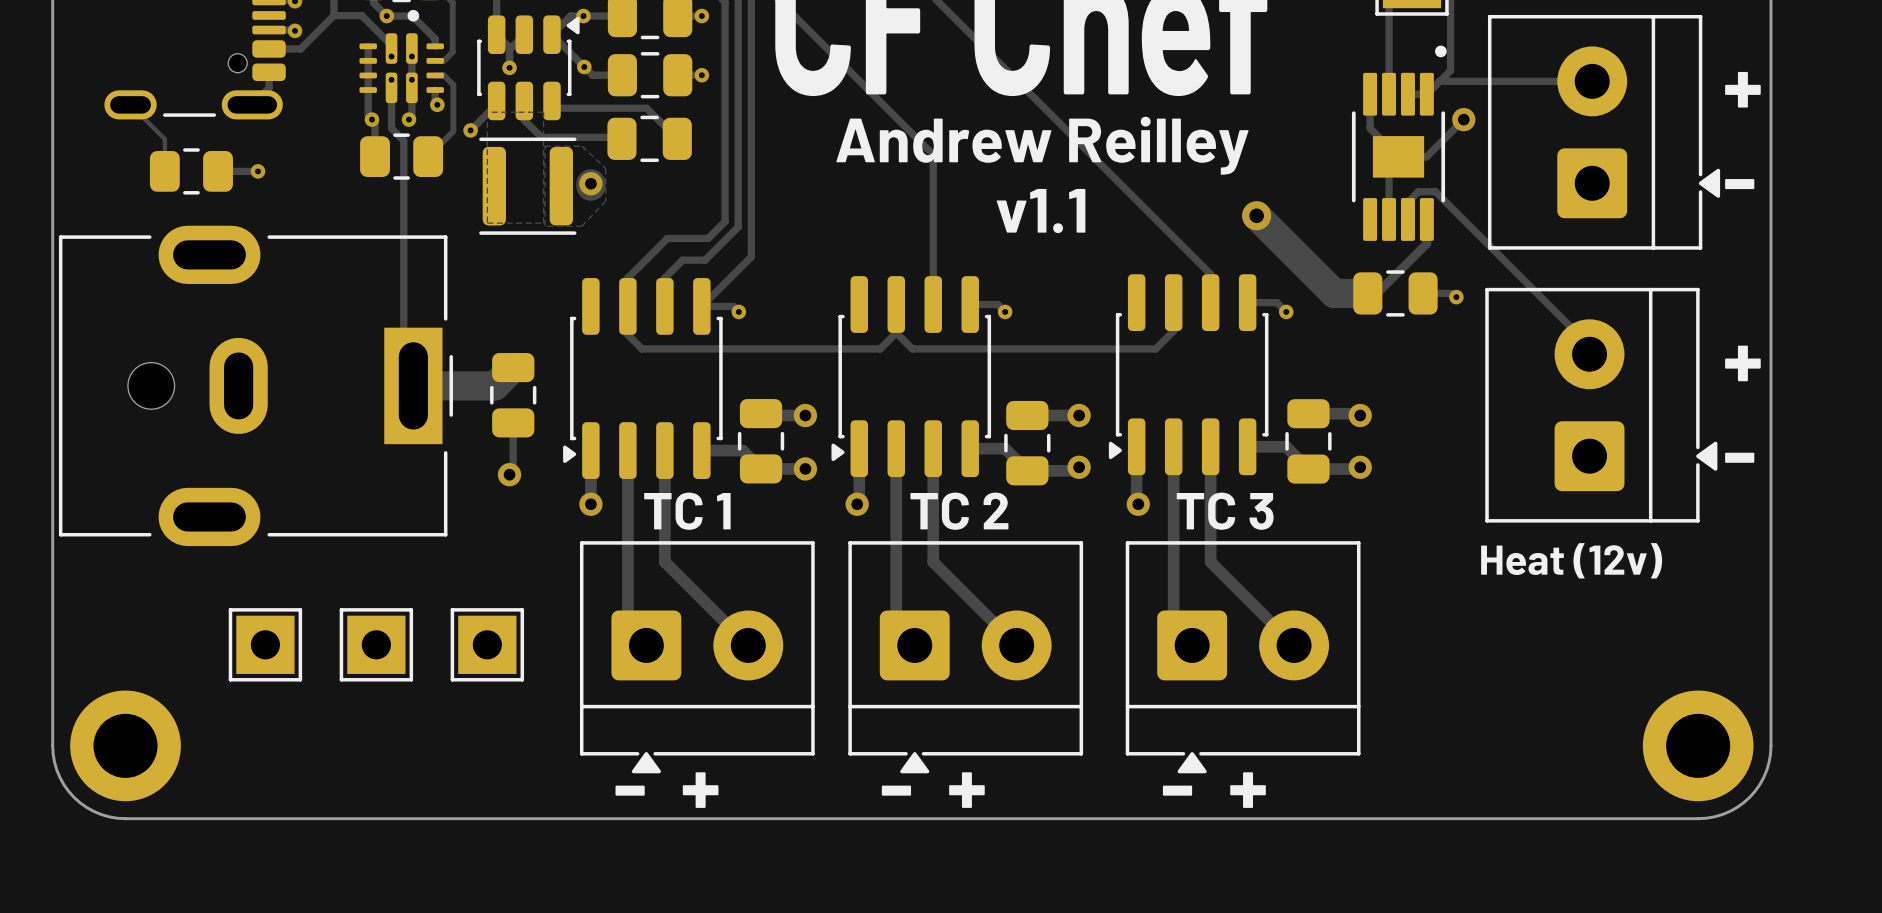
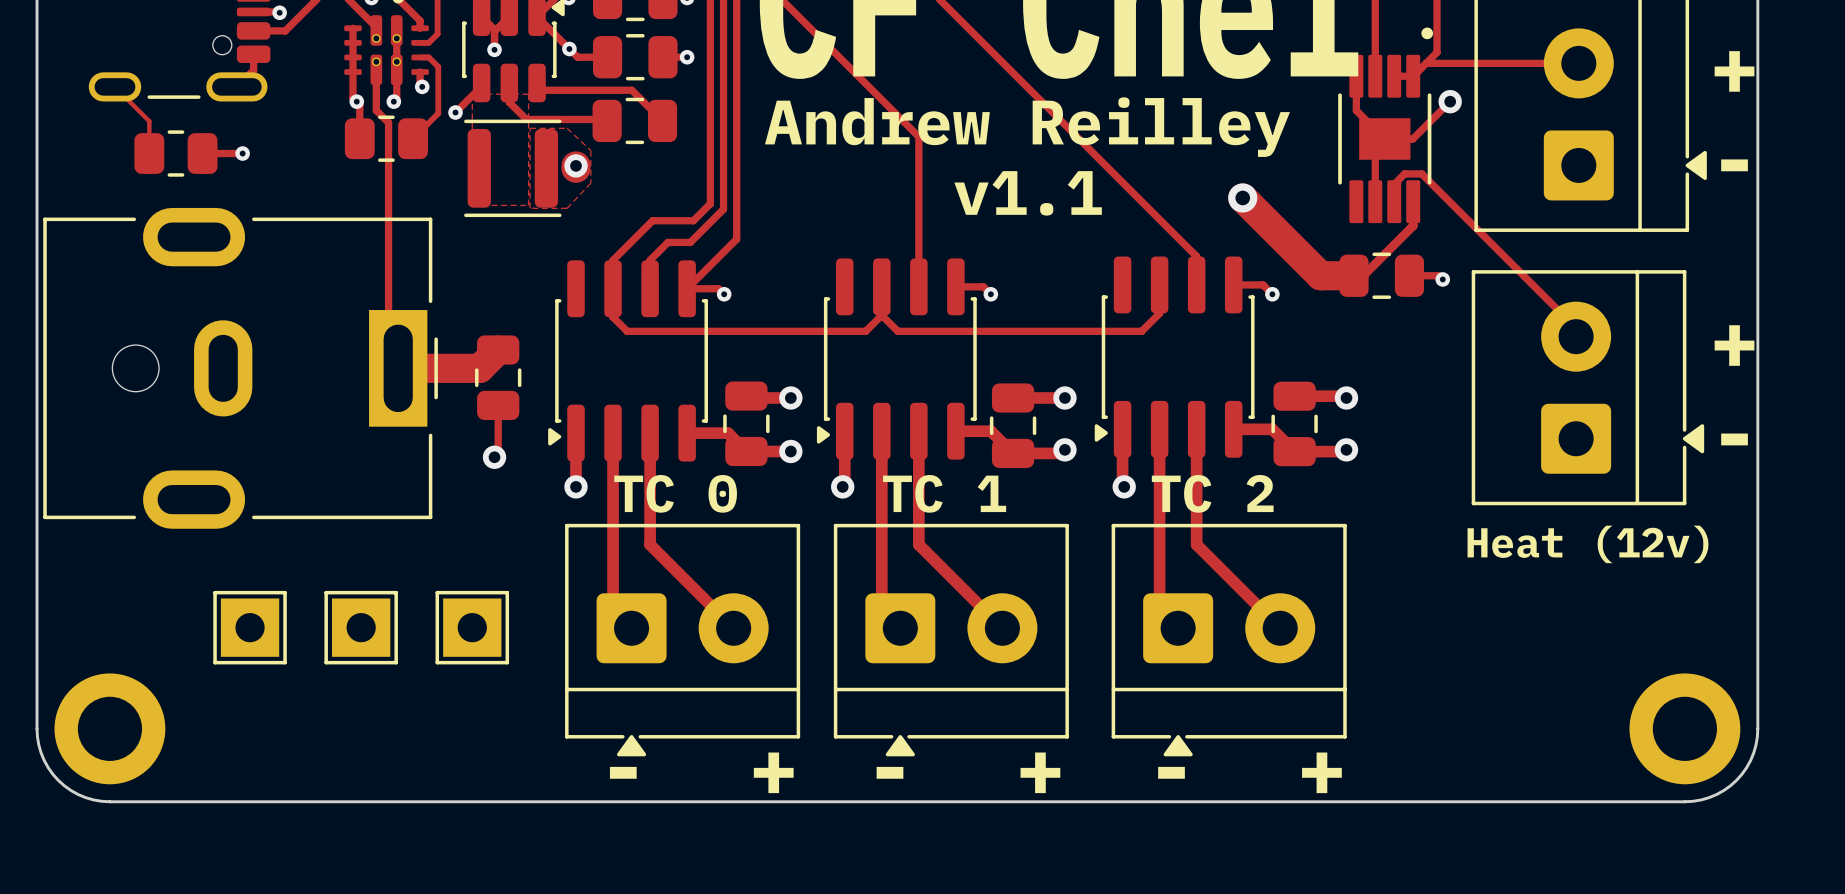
text: TC 1 (687, 511) -> TC 0 (675, 493)
text: TC 2 (959, 511) -> TC 1 (944, 493)
text: TC 3 (1225, 511) -> TC 2 (1212, 493)

